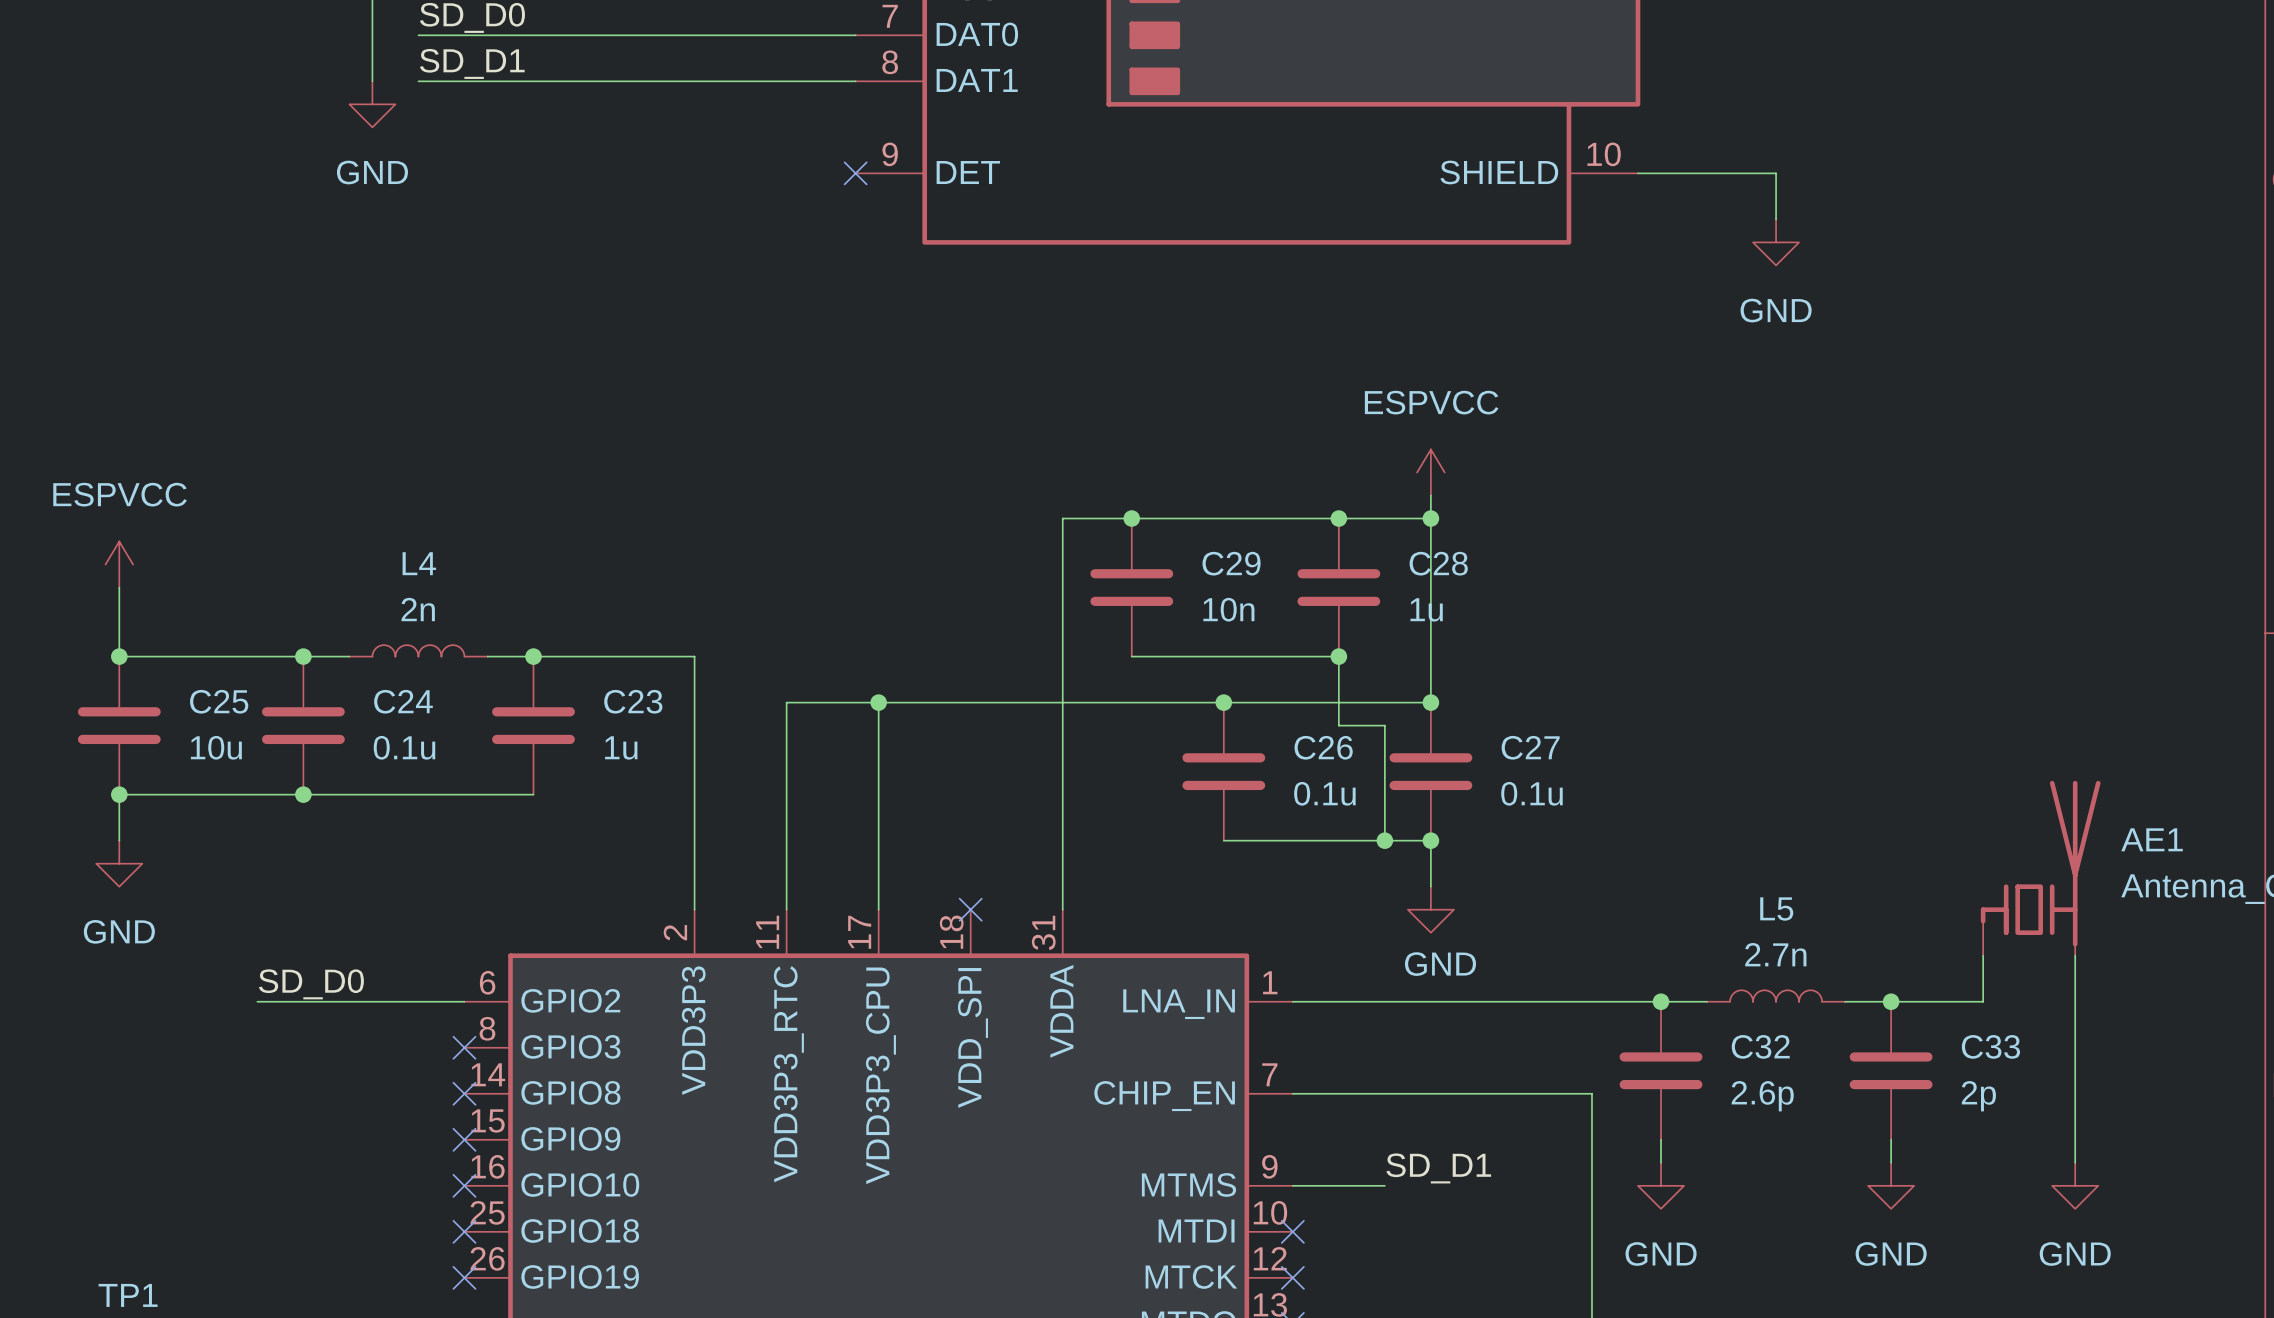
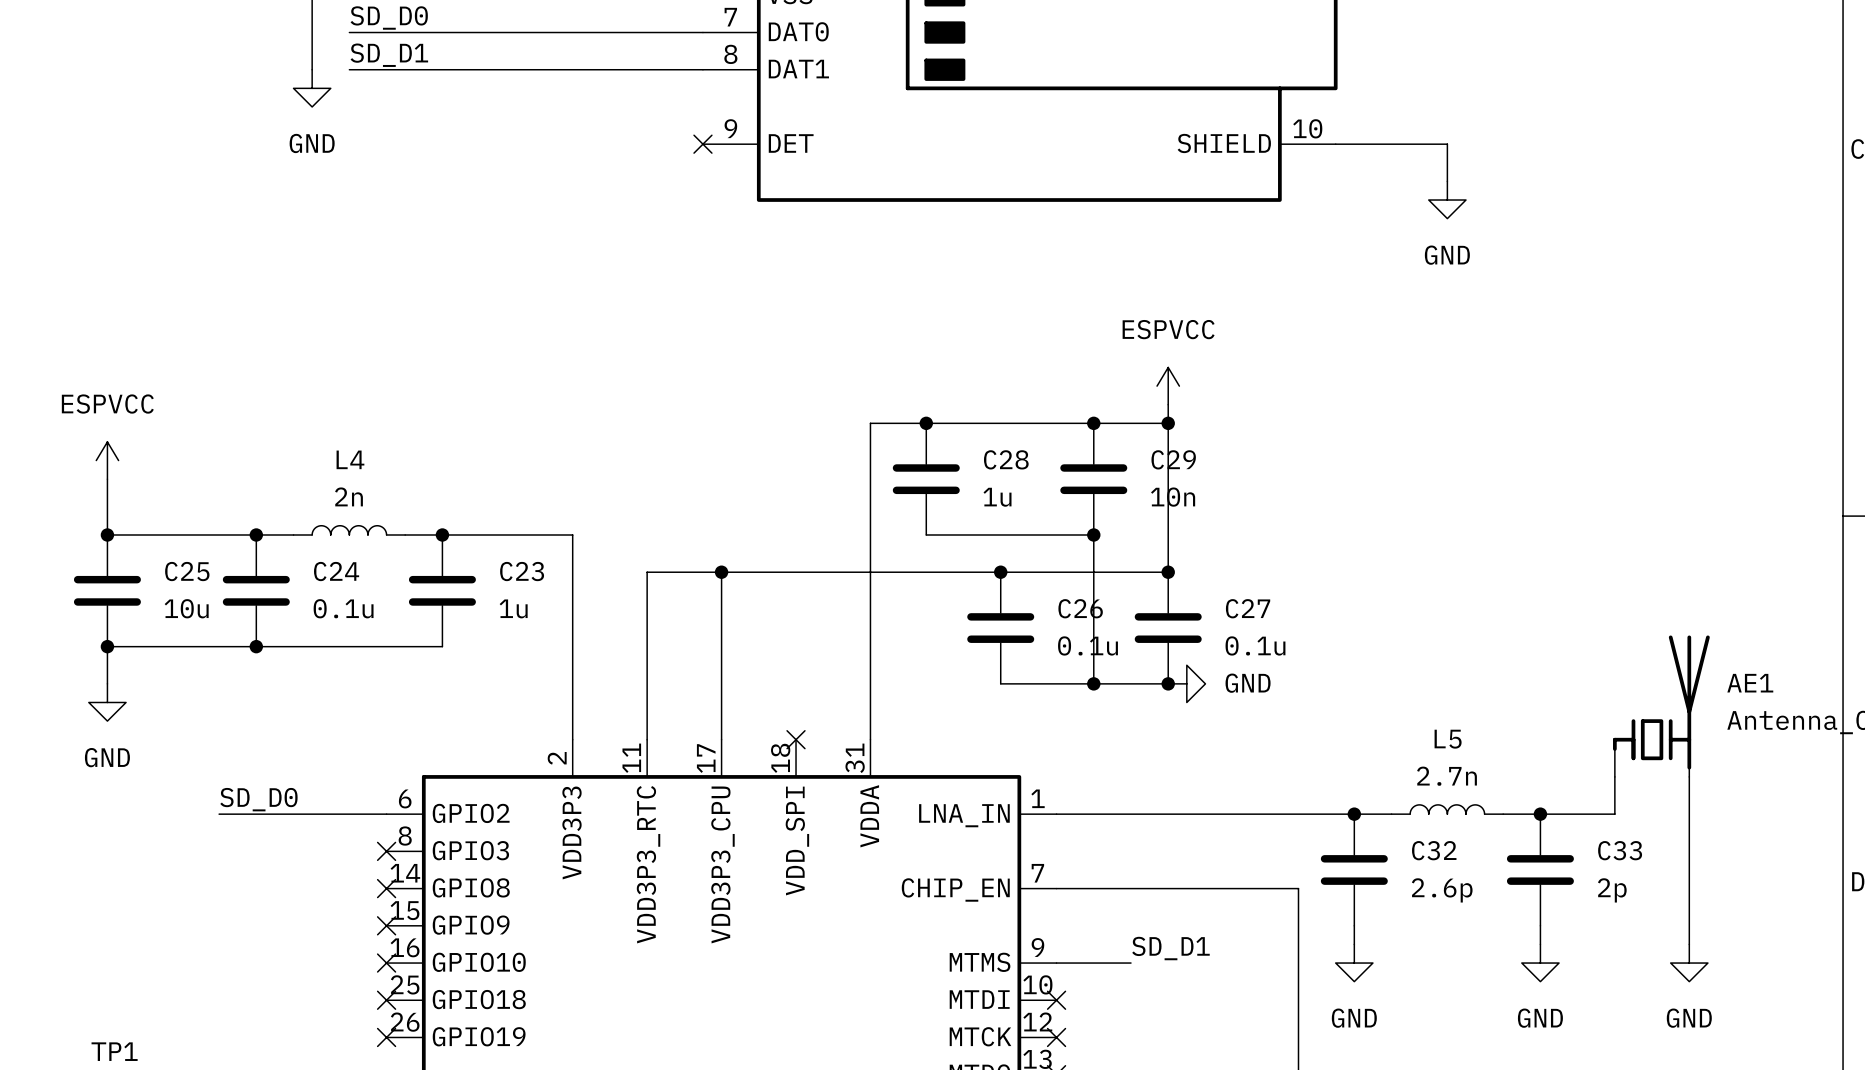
C29 name: C29 (1231, 563) -> C28 (1006, 459)
C28 name: C28 (1438, 563) -> C29 (1173, 459)
C29 value: 10n (1228, 609) -> 1u (997, 497)
C28 value: 1u (1426, 609) -> 10n (1173, 497)
wire: (1338, 725) (1384, 725) (1384, 840) -> (1093, 590) (1093, 683)
junction position: (1384, 840) -> (1093, 683)
wire: (1430, 840) (1430, 886) -> none
power symbol rotation: 0° (1430, 909) -> 90° counterclockwise (1186, 683)
power symbol position: GND (1430, 909) -> GND (1186, 683)
power symbol text position: GND (1440, 964) -> GND (1248, 683)

